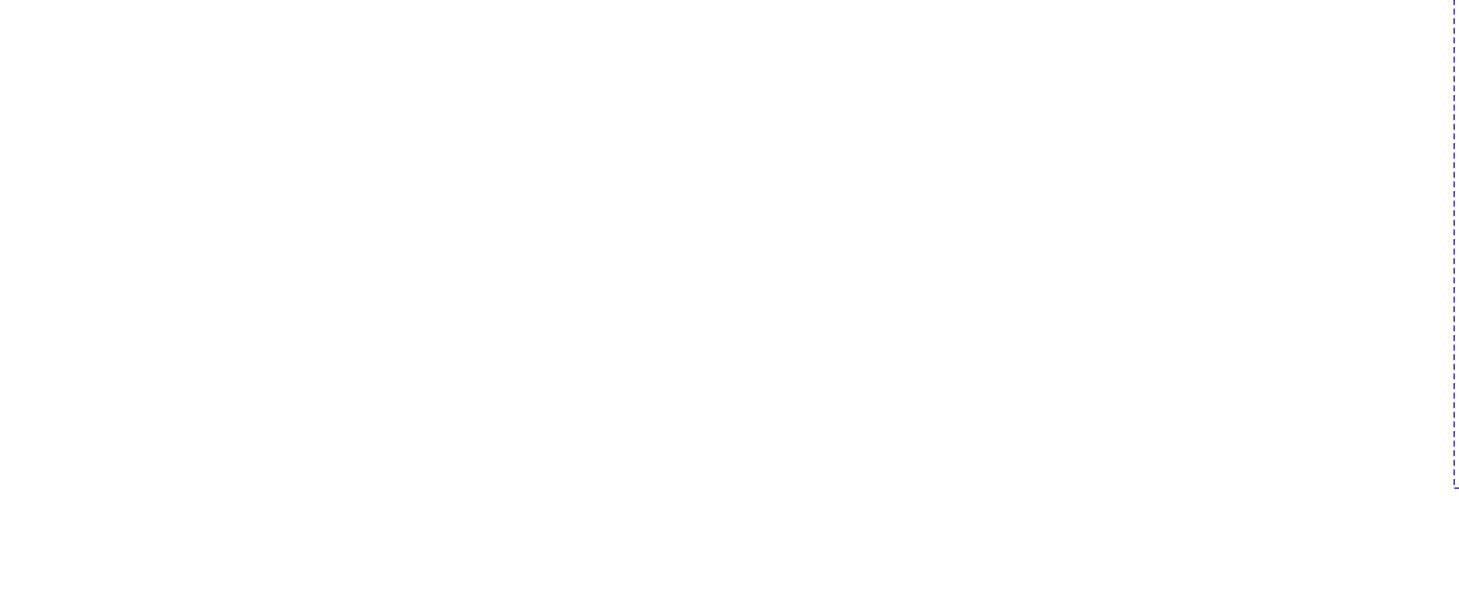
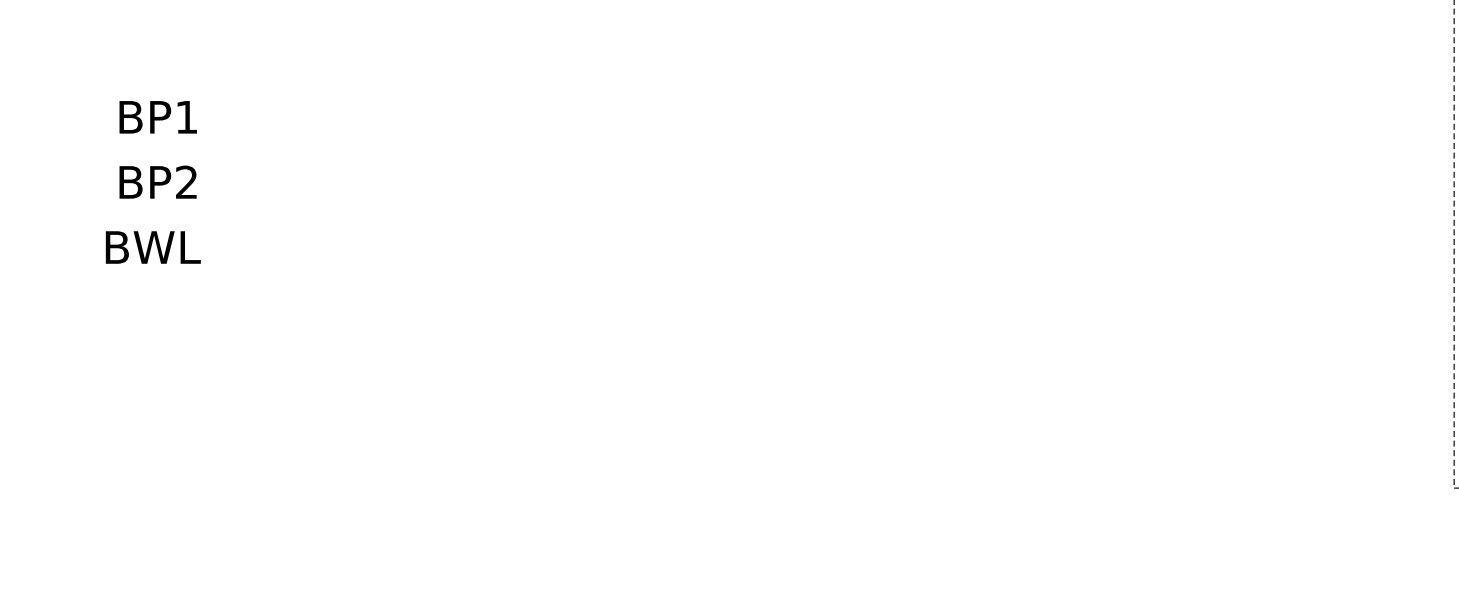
label: none -> BP1 (158, 117)
label: none -> BP2 (158, 182)
label: none -> BWL (153, 247)

